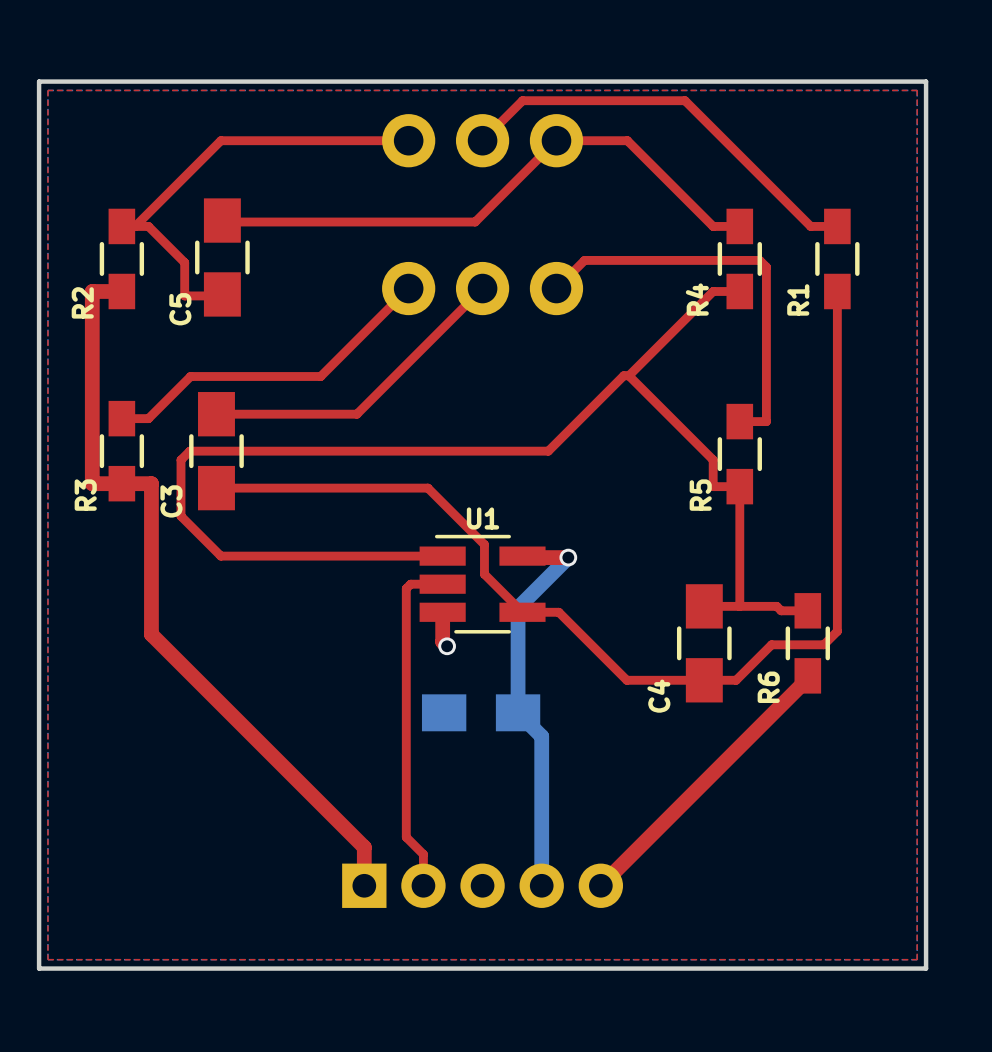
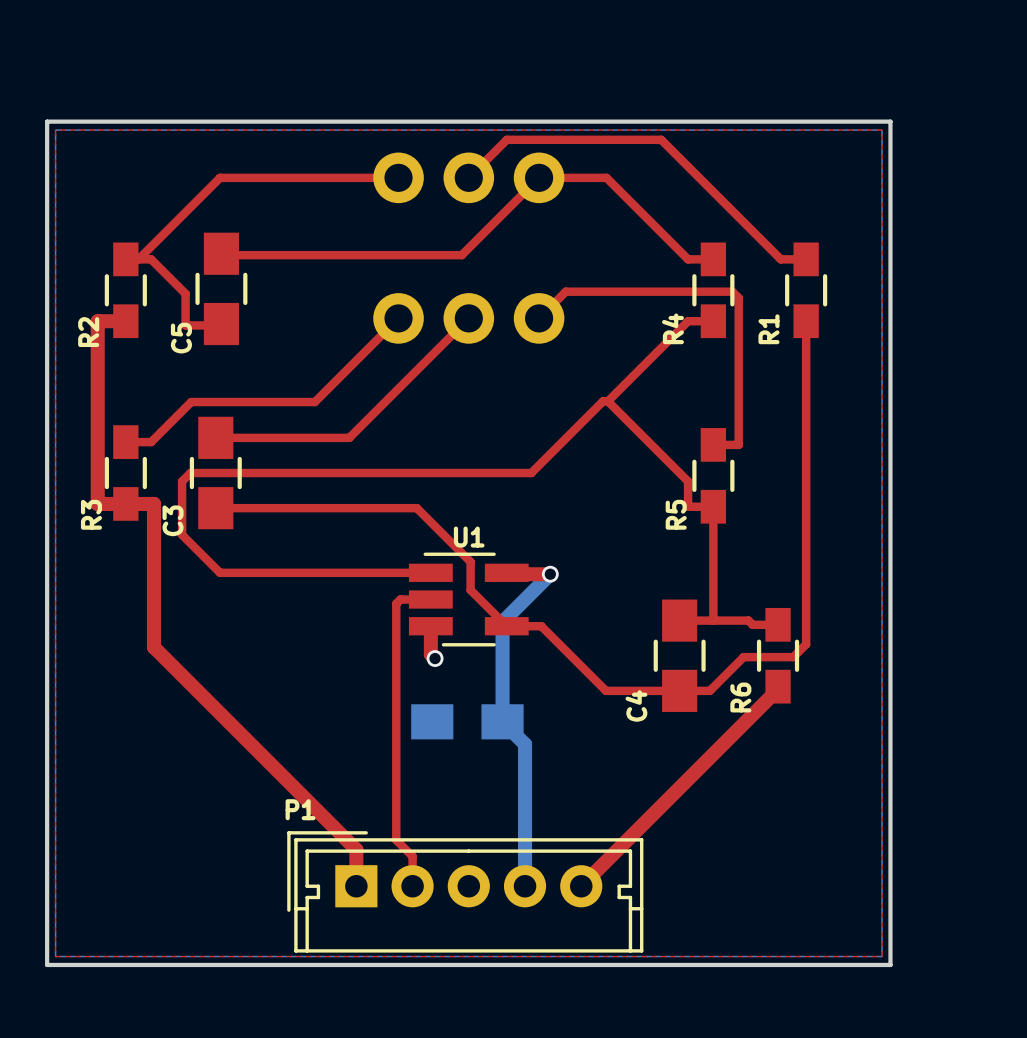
P1 side: bottom (482, 885) -> top (465, 891)

